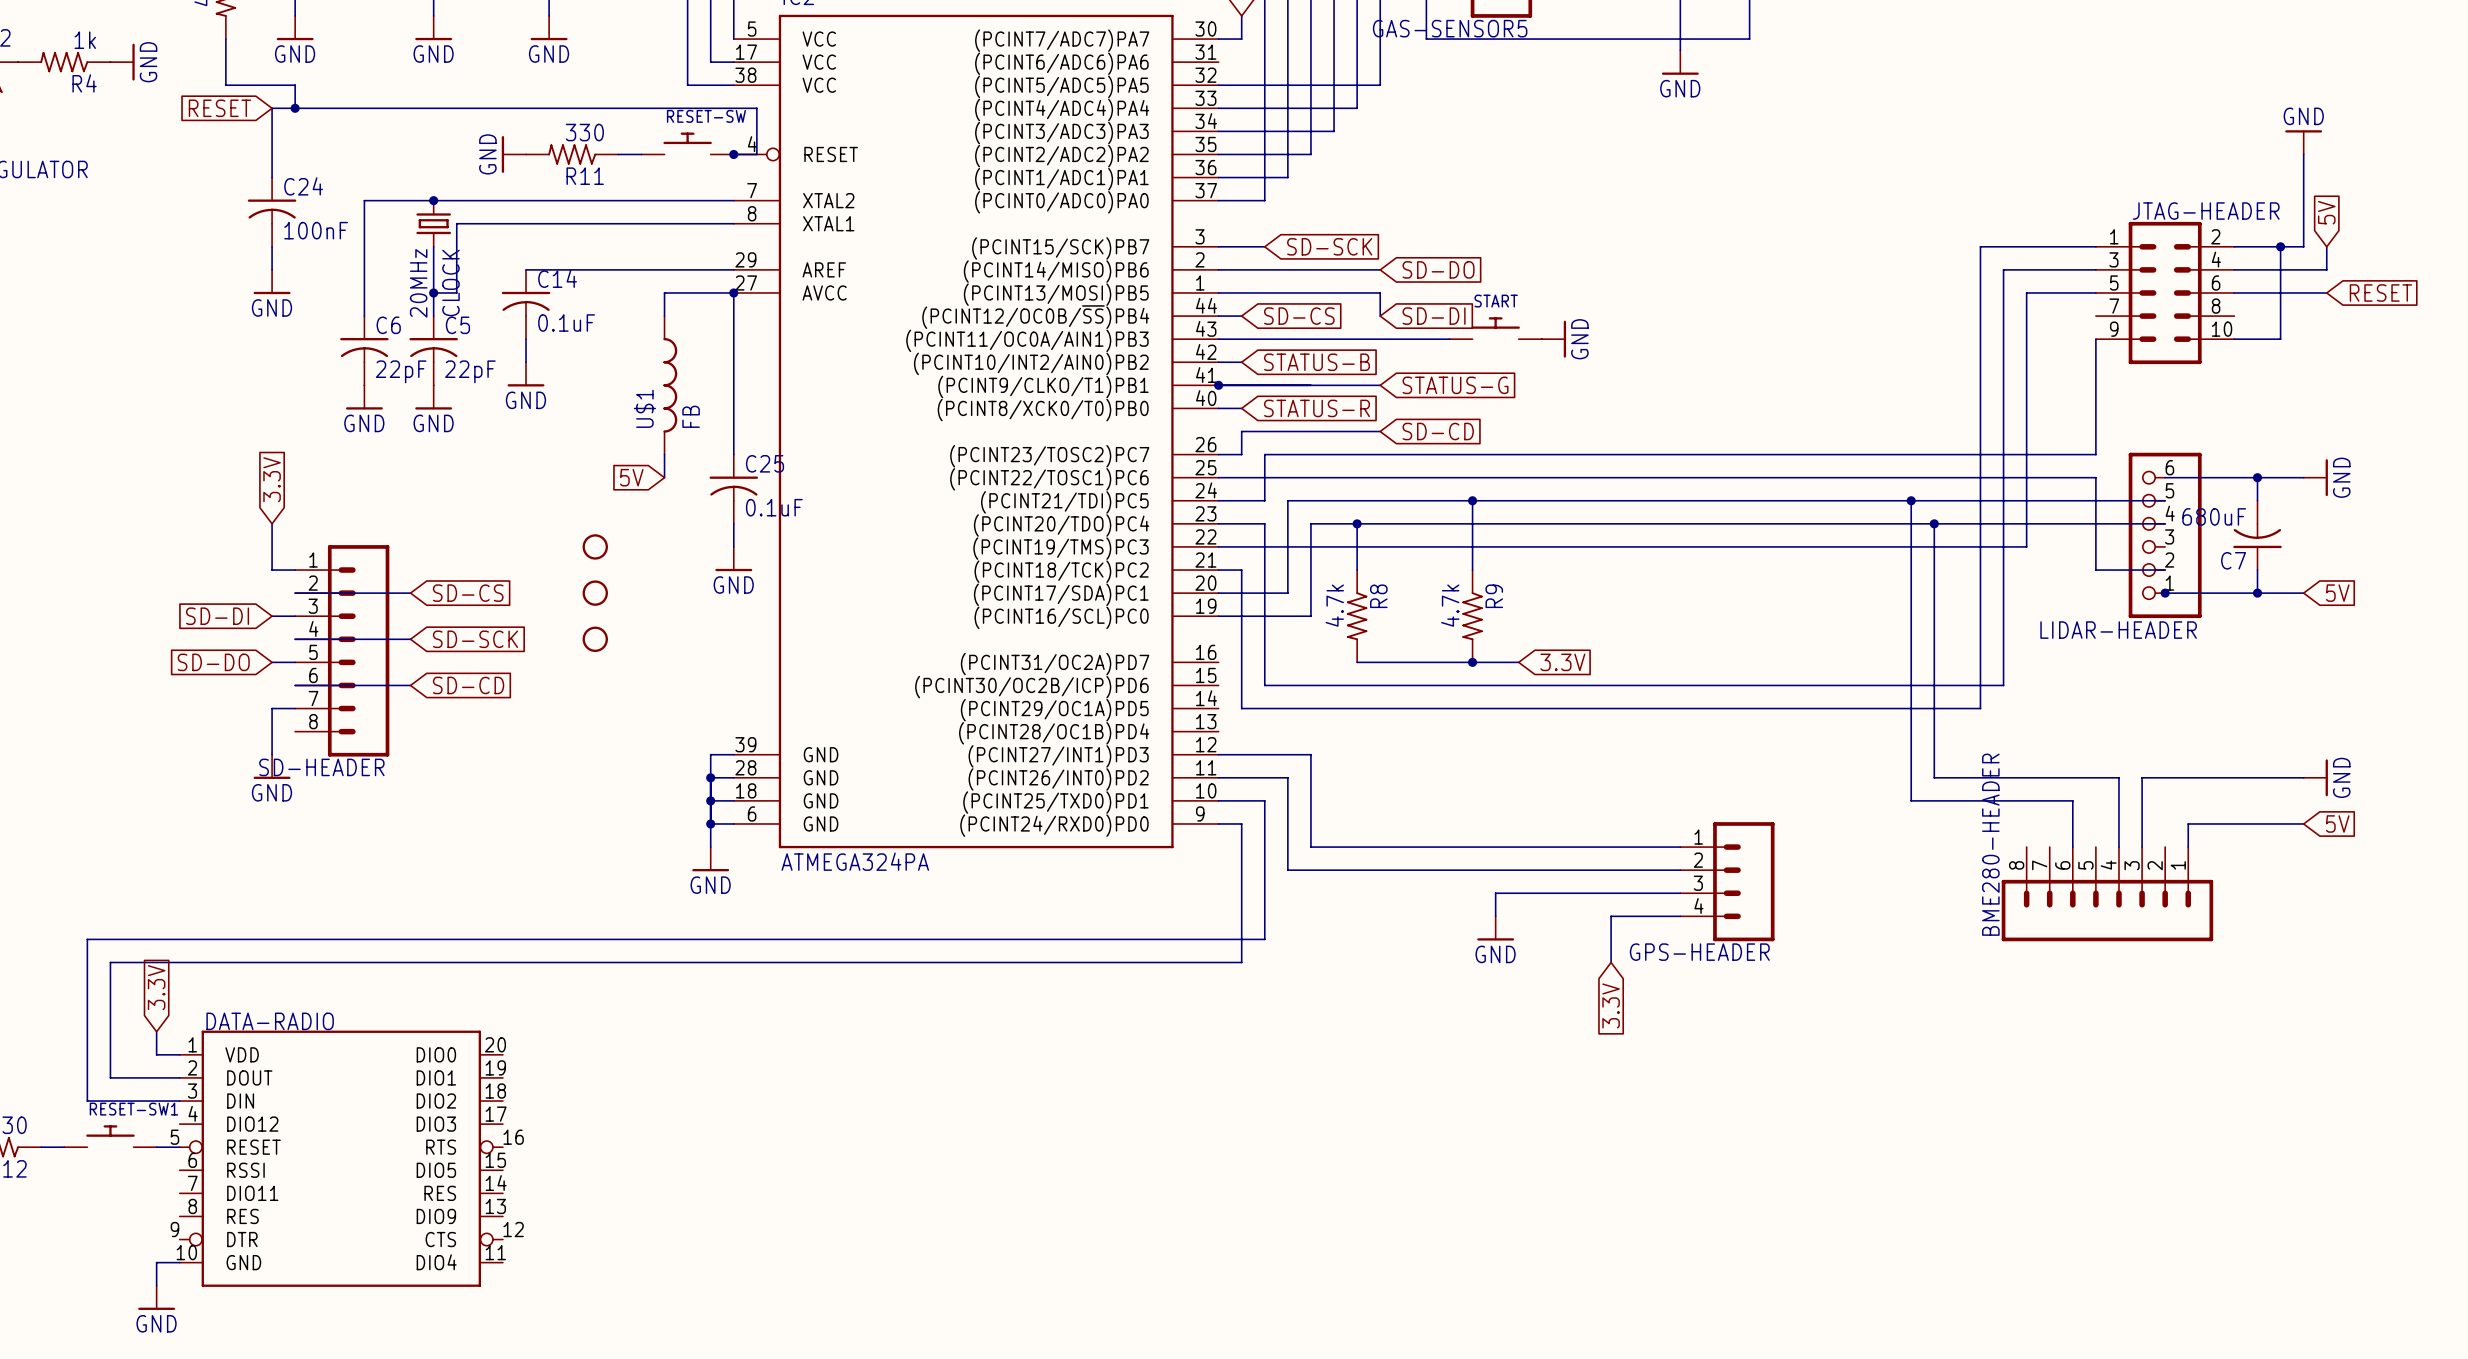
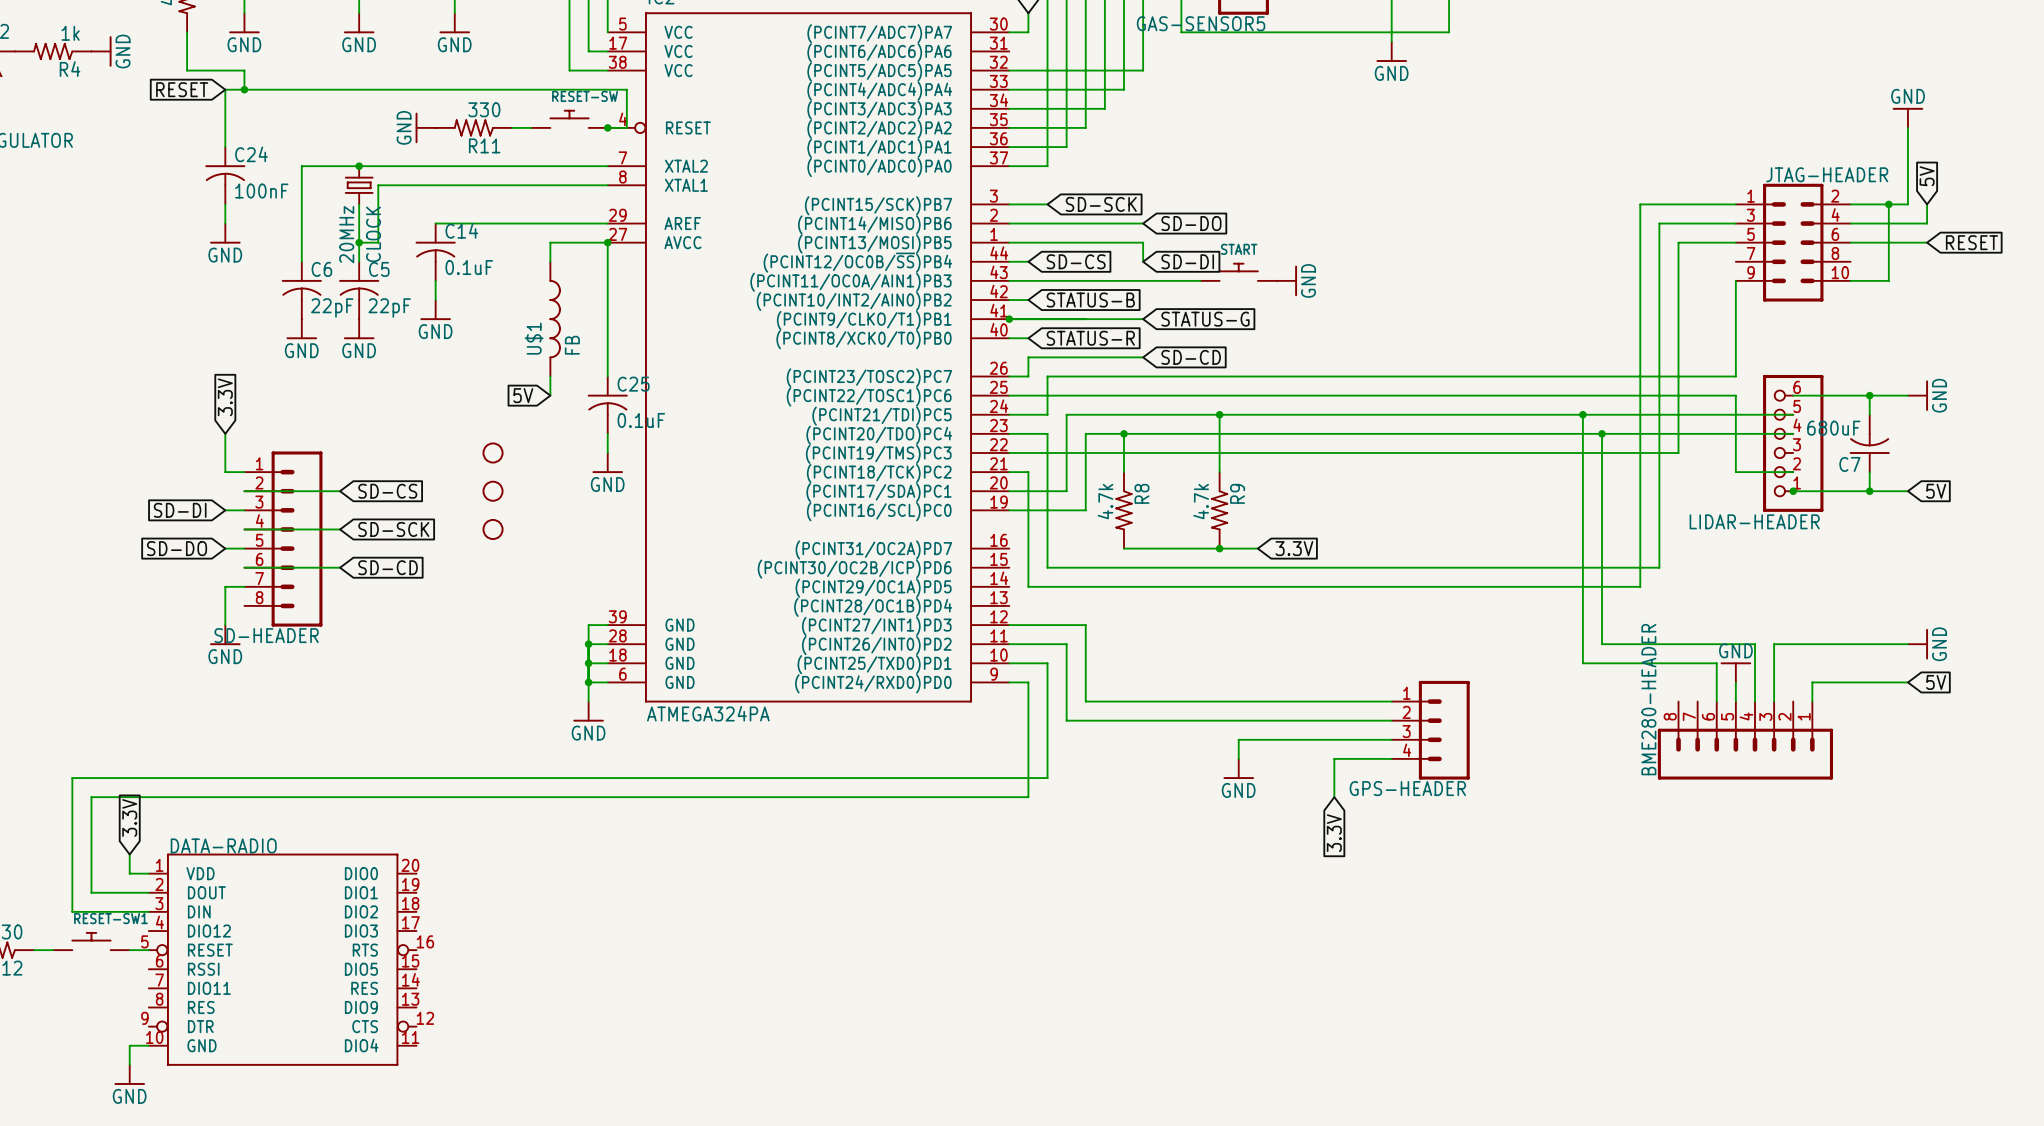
power symbol: none -> GND (1735, 672)
wire: none -> (1735, 682) (1735, 701)

